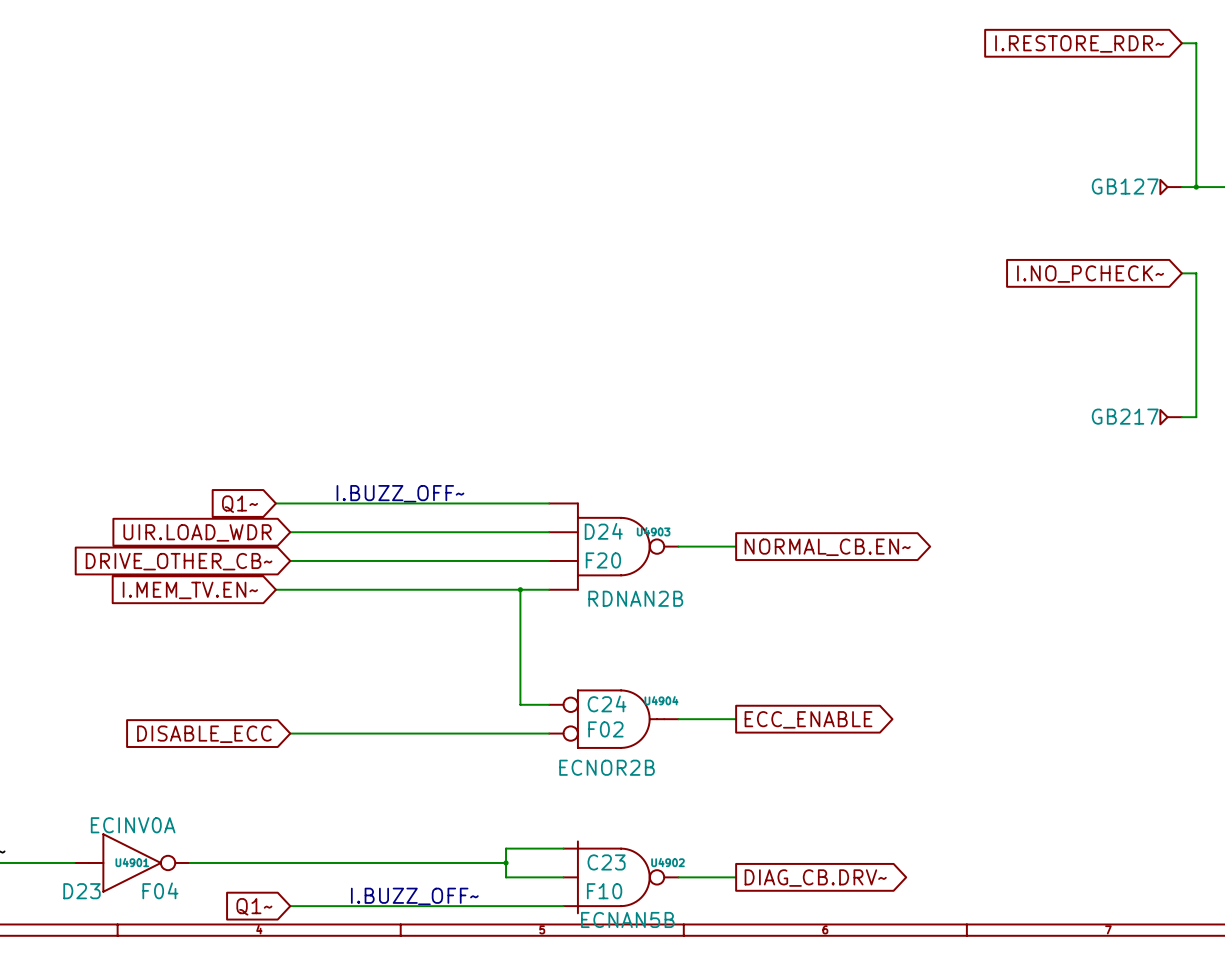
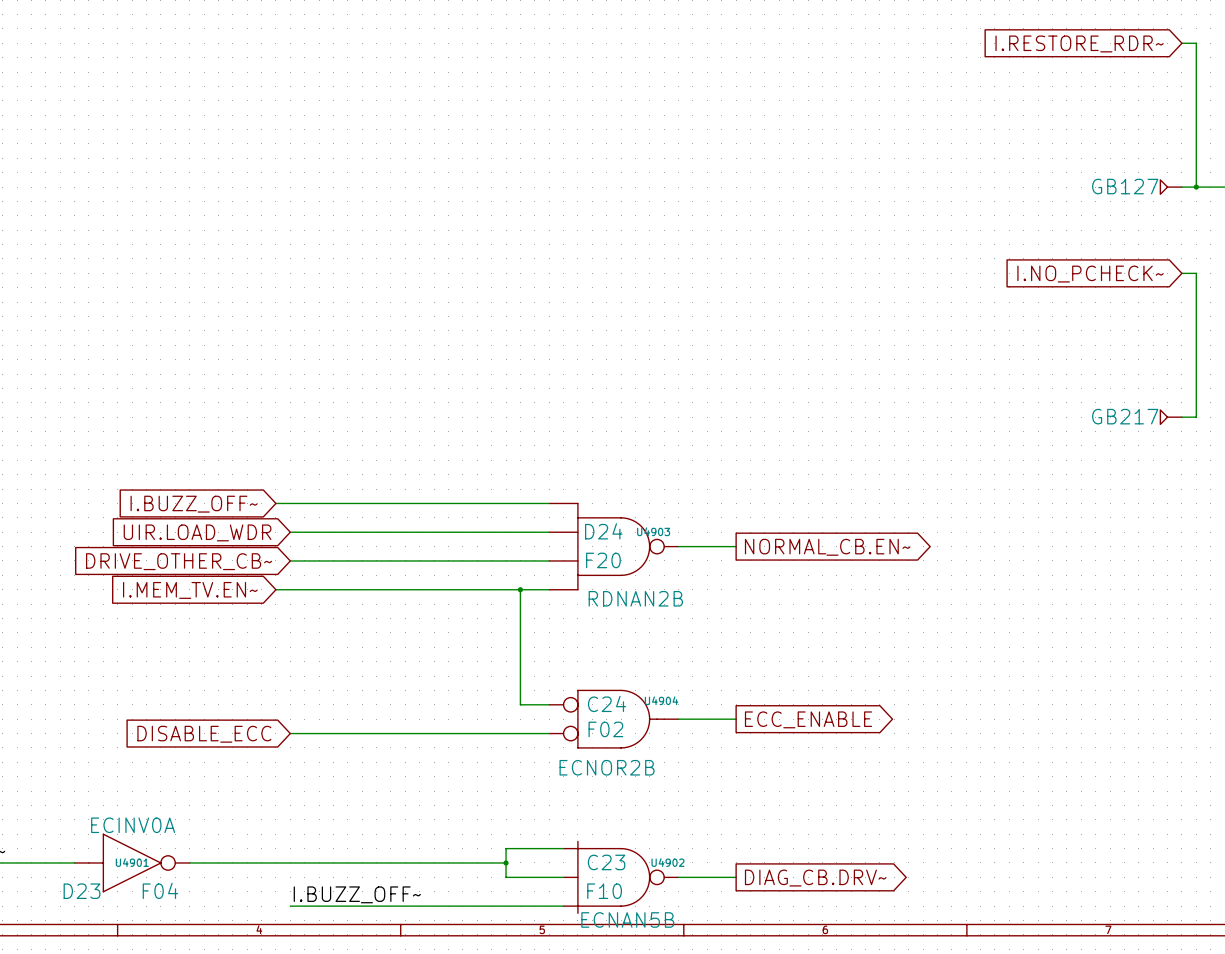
text: I.BUZZ_OFF~ (400, 493) -> none
global label: Q1~ (240, 504) -> I.BUZZ_OFF~ (194, 504)
label: none -> I.BUZZ_OFF~ (357, 894)
text: I.BUZZ_OFF~ (414, 896) -> none
global label: Q1~ (254, 906) -> none

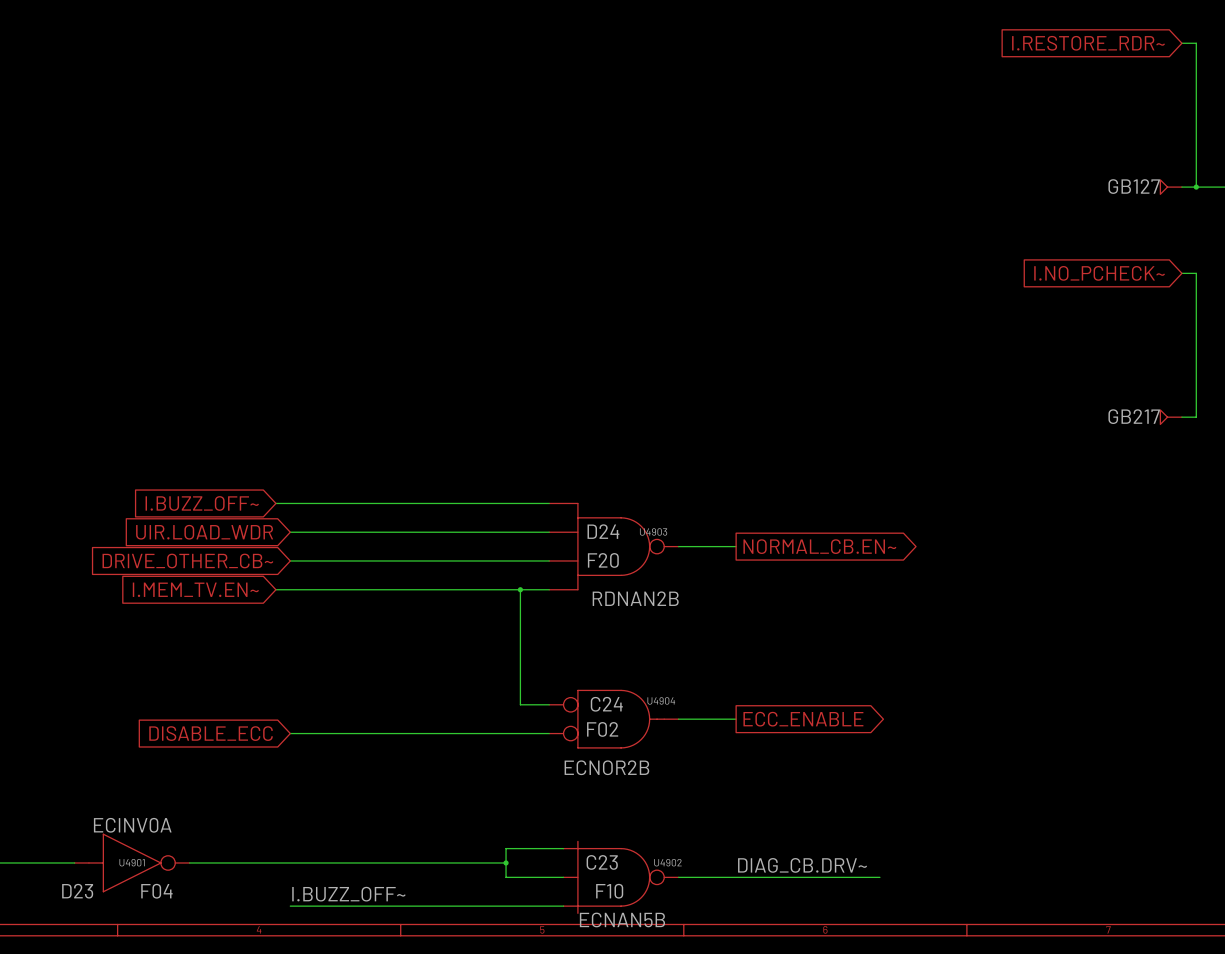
label: none -> DIAG_CB.DRV~ (802, 865)
wire: none -> (736, 877) (879, 877)
global label: DIAG_CB.DRV~ (815, 878) -> none

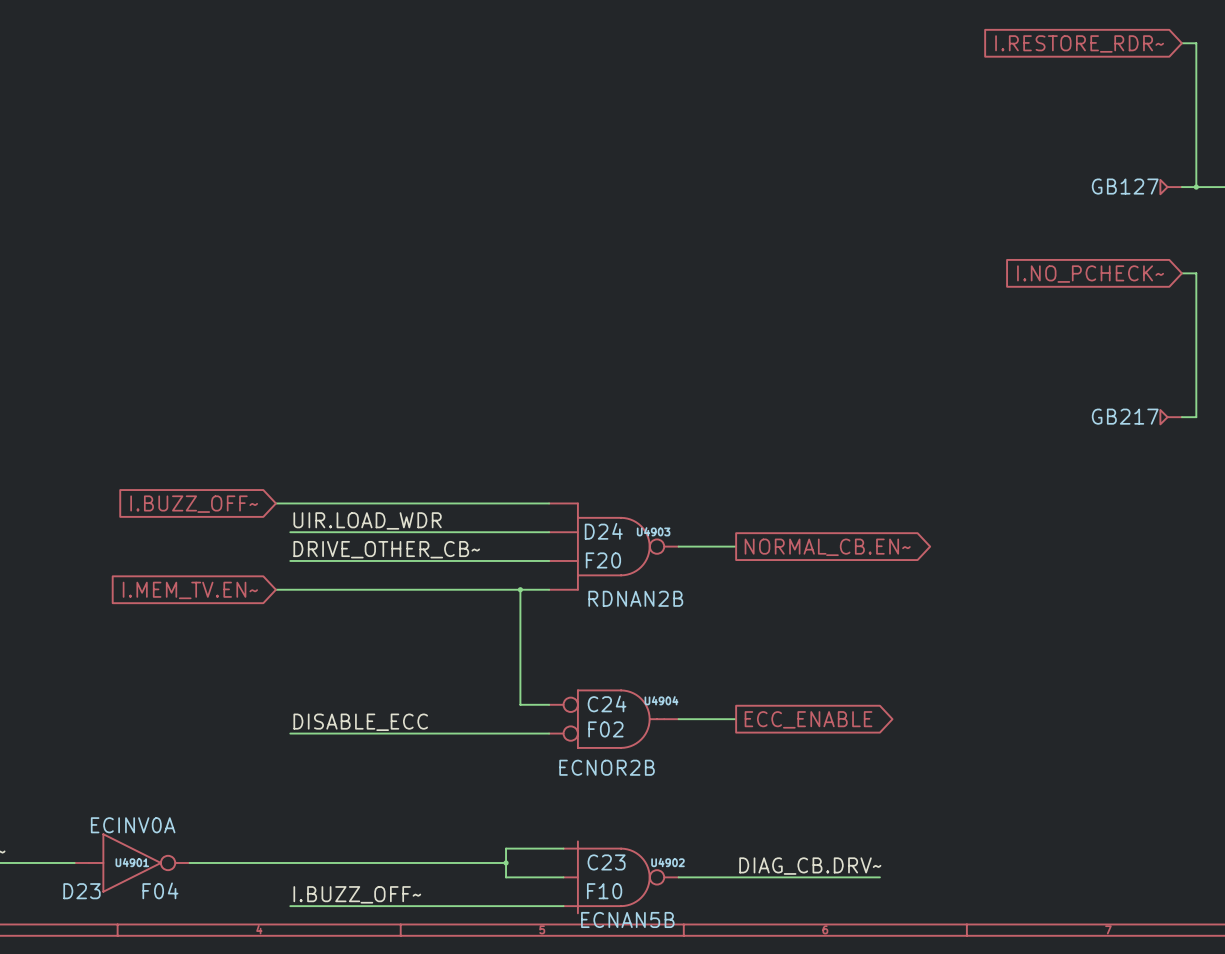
label: none -> UIR.LOAD_WDR (367, 520)
global label: UIR.LOAD_WDR (204, 532) -> none
label: none -> DRIVE_OTHER_CB~ (386, 549)
global label: DRIVE_OTHER_CB~ (187, 561) -> none
label: none -> DISABLE_ECC (360, 722)
global label: DISABLE_ECC (211, 733) -> none

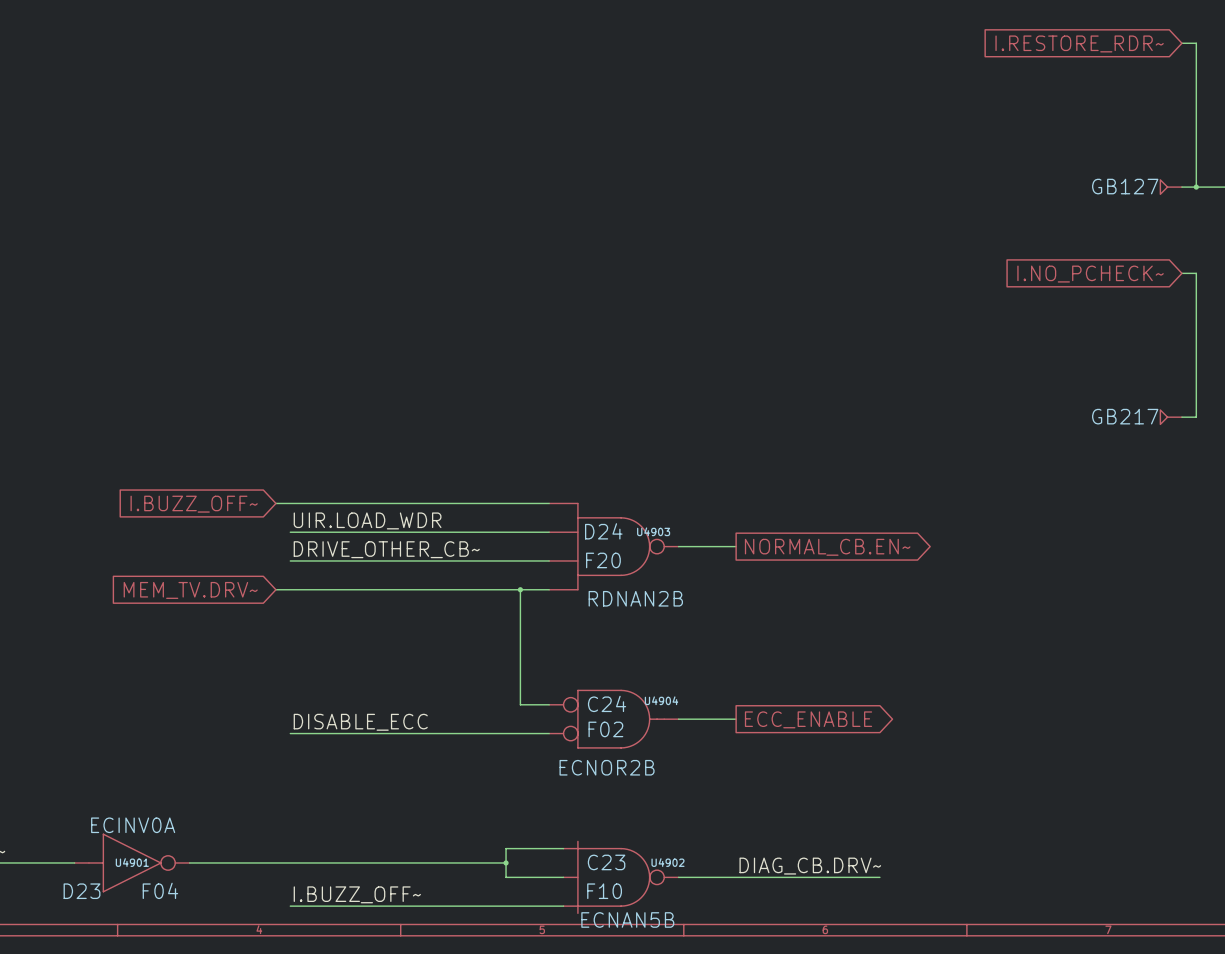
global label: I.MEM_TV.EN~ (190, 590) -> MEM_TV.DRV~ (190, 590)

